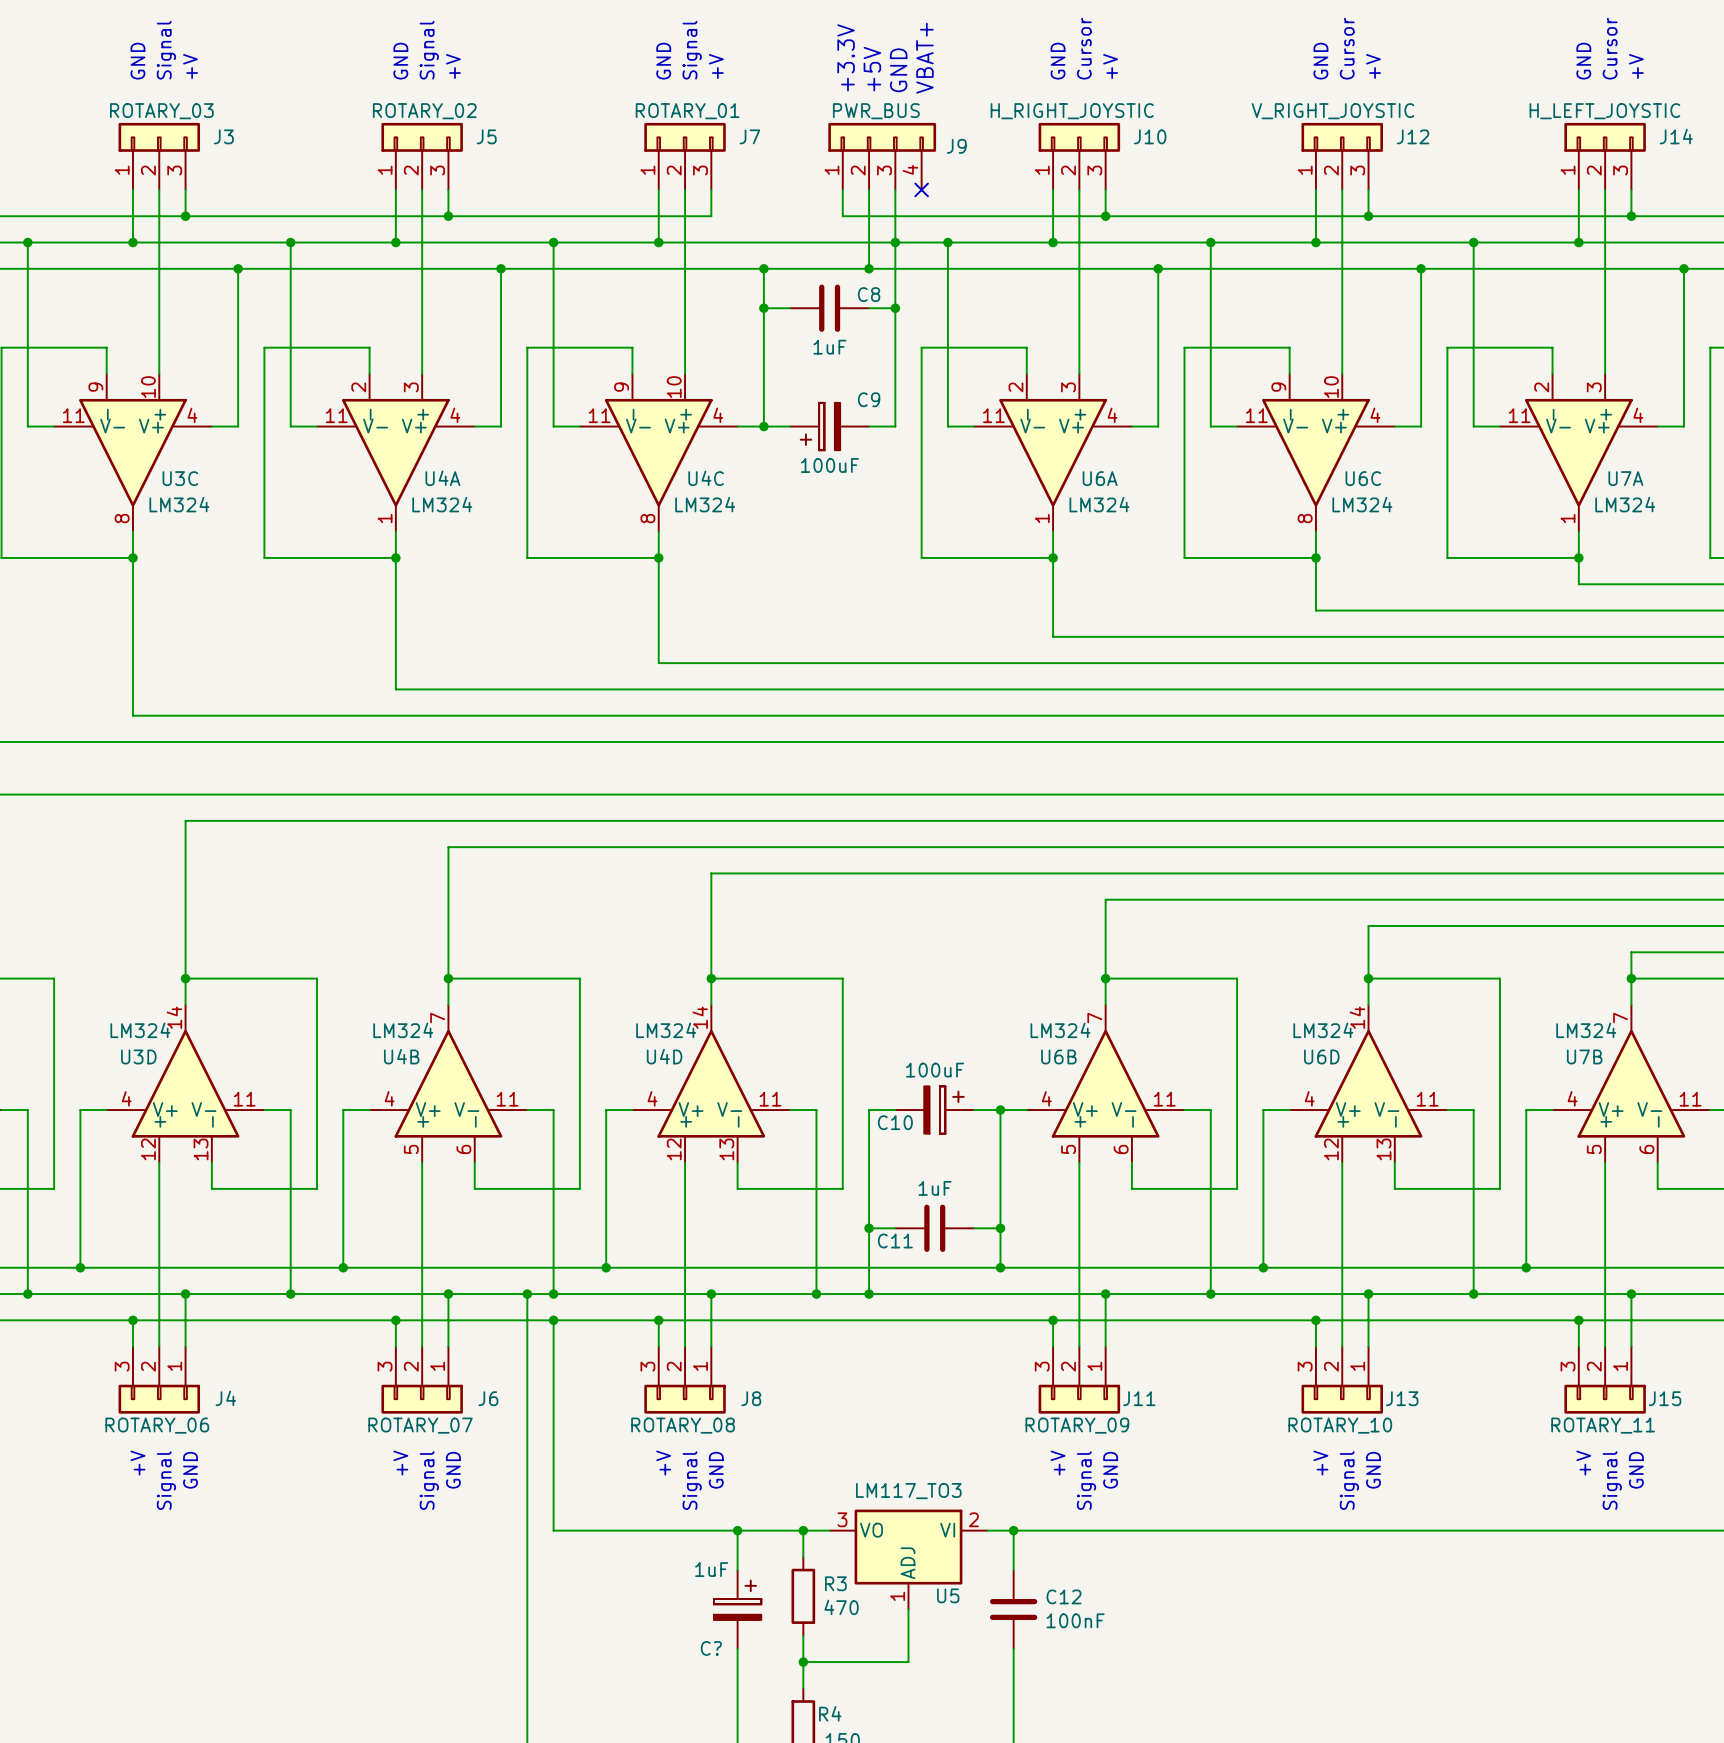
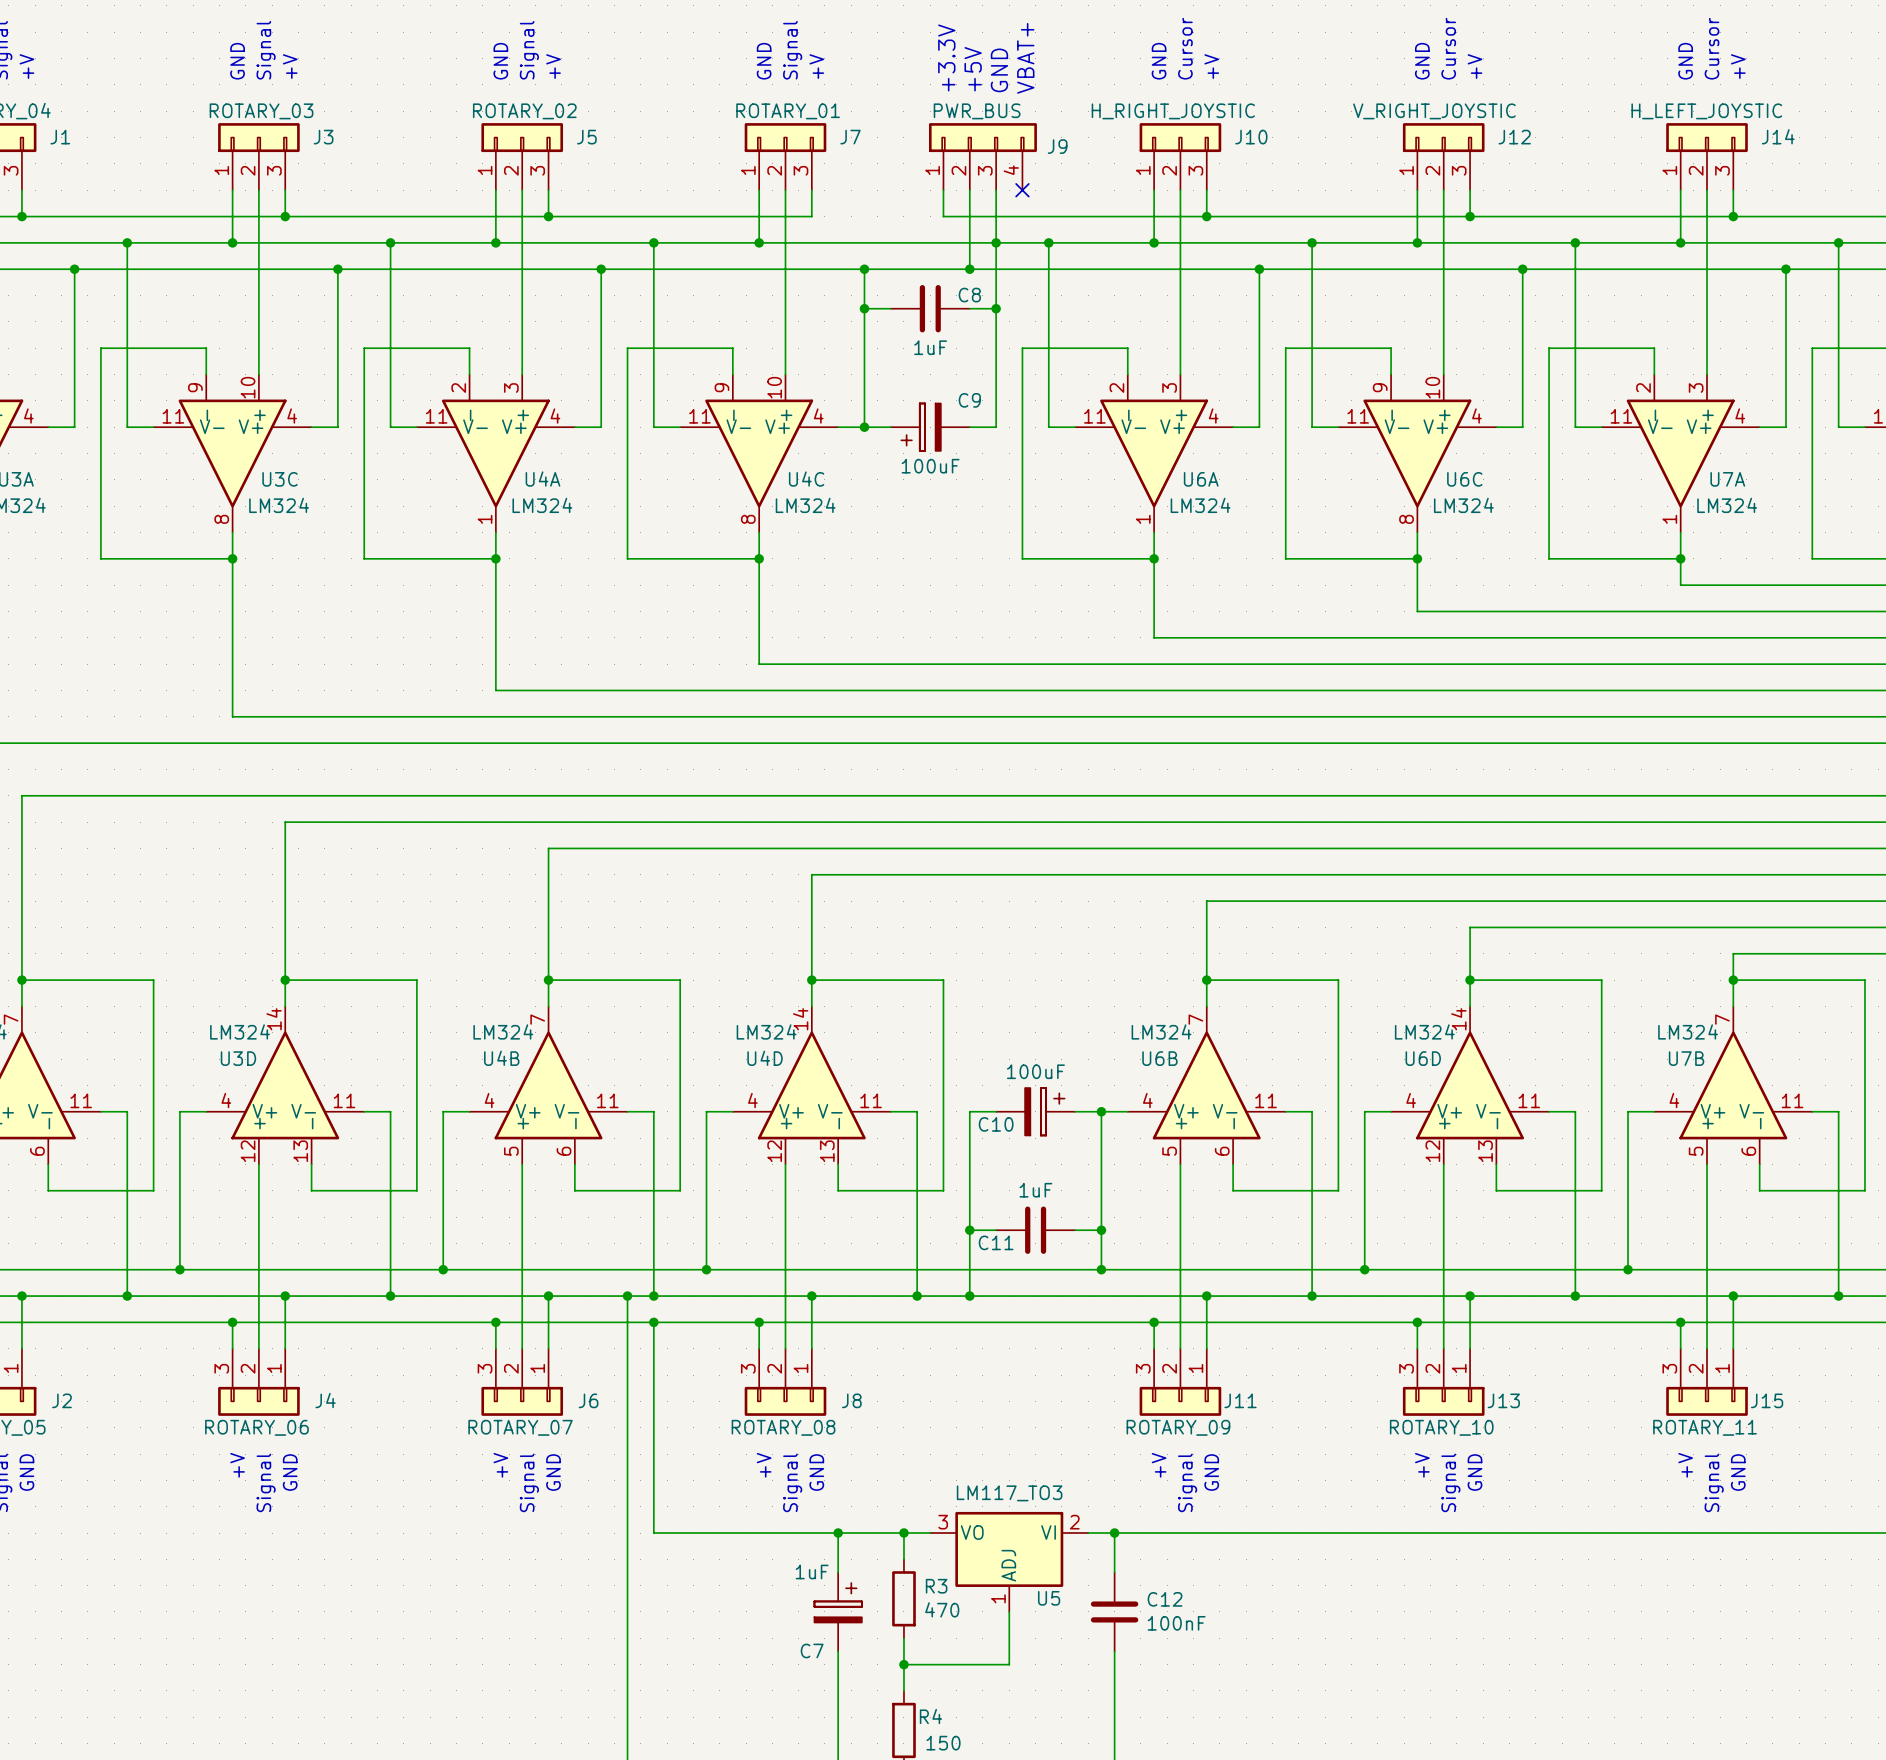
C? name: C? (711, 1648) -> C7 (812, 1650)

